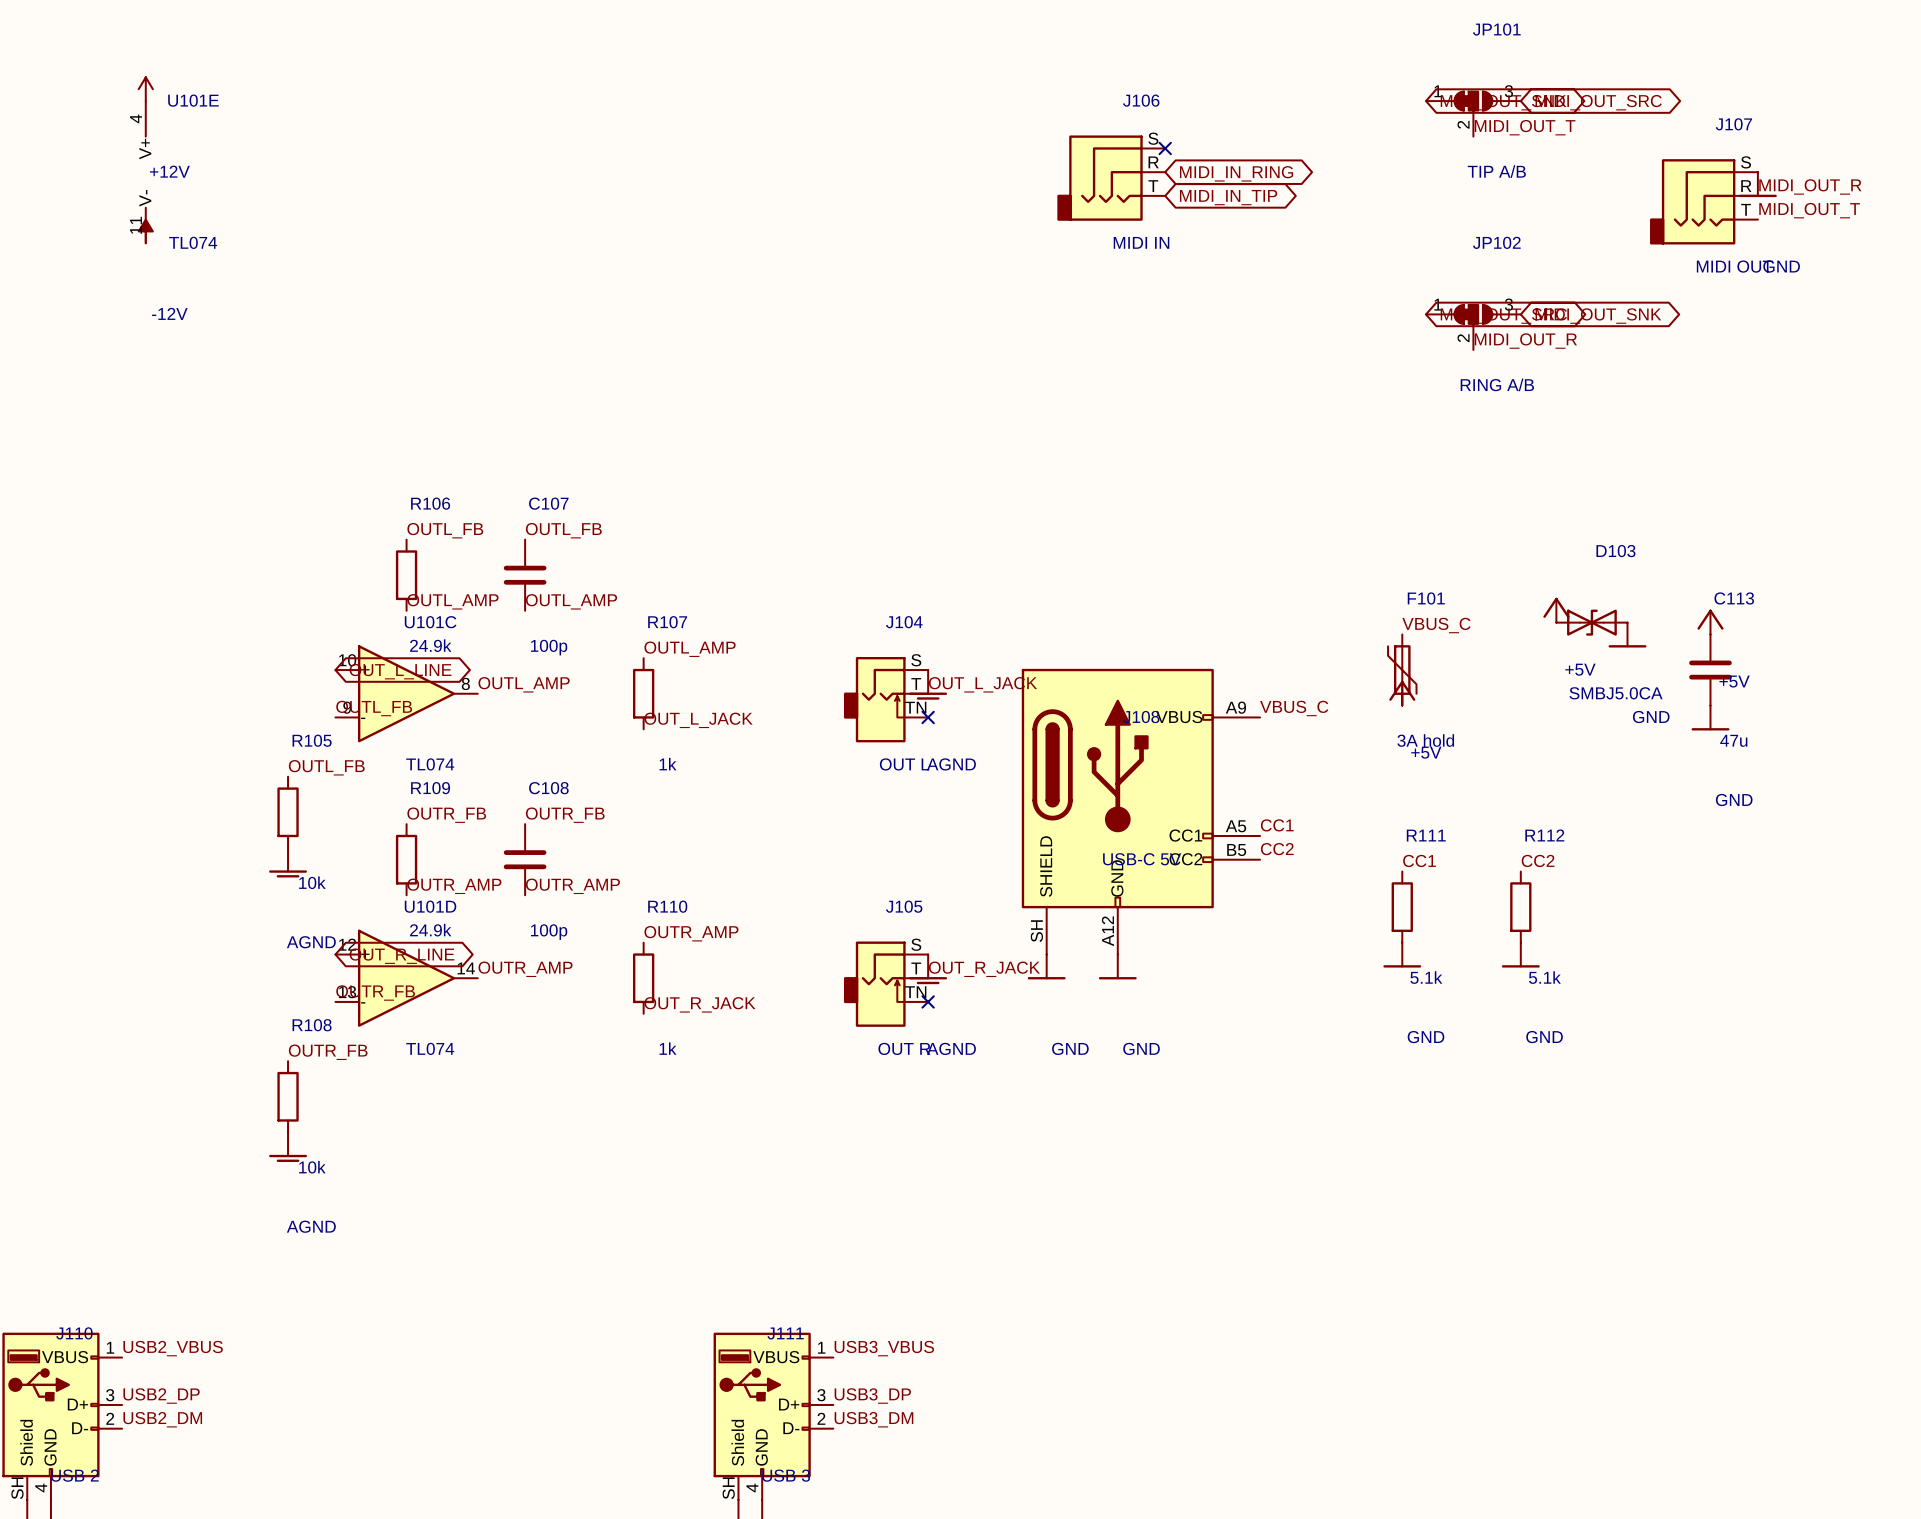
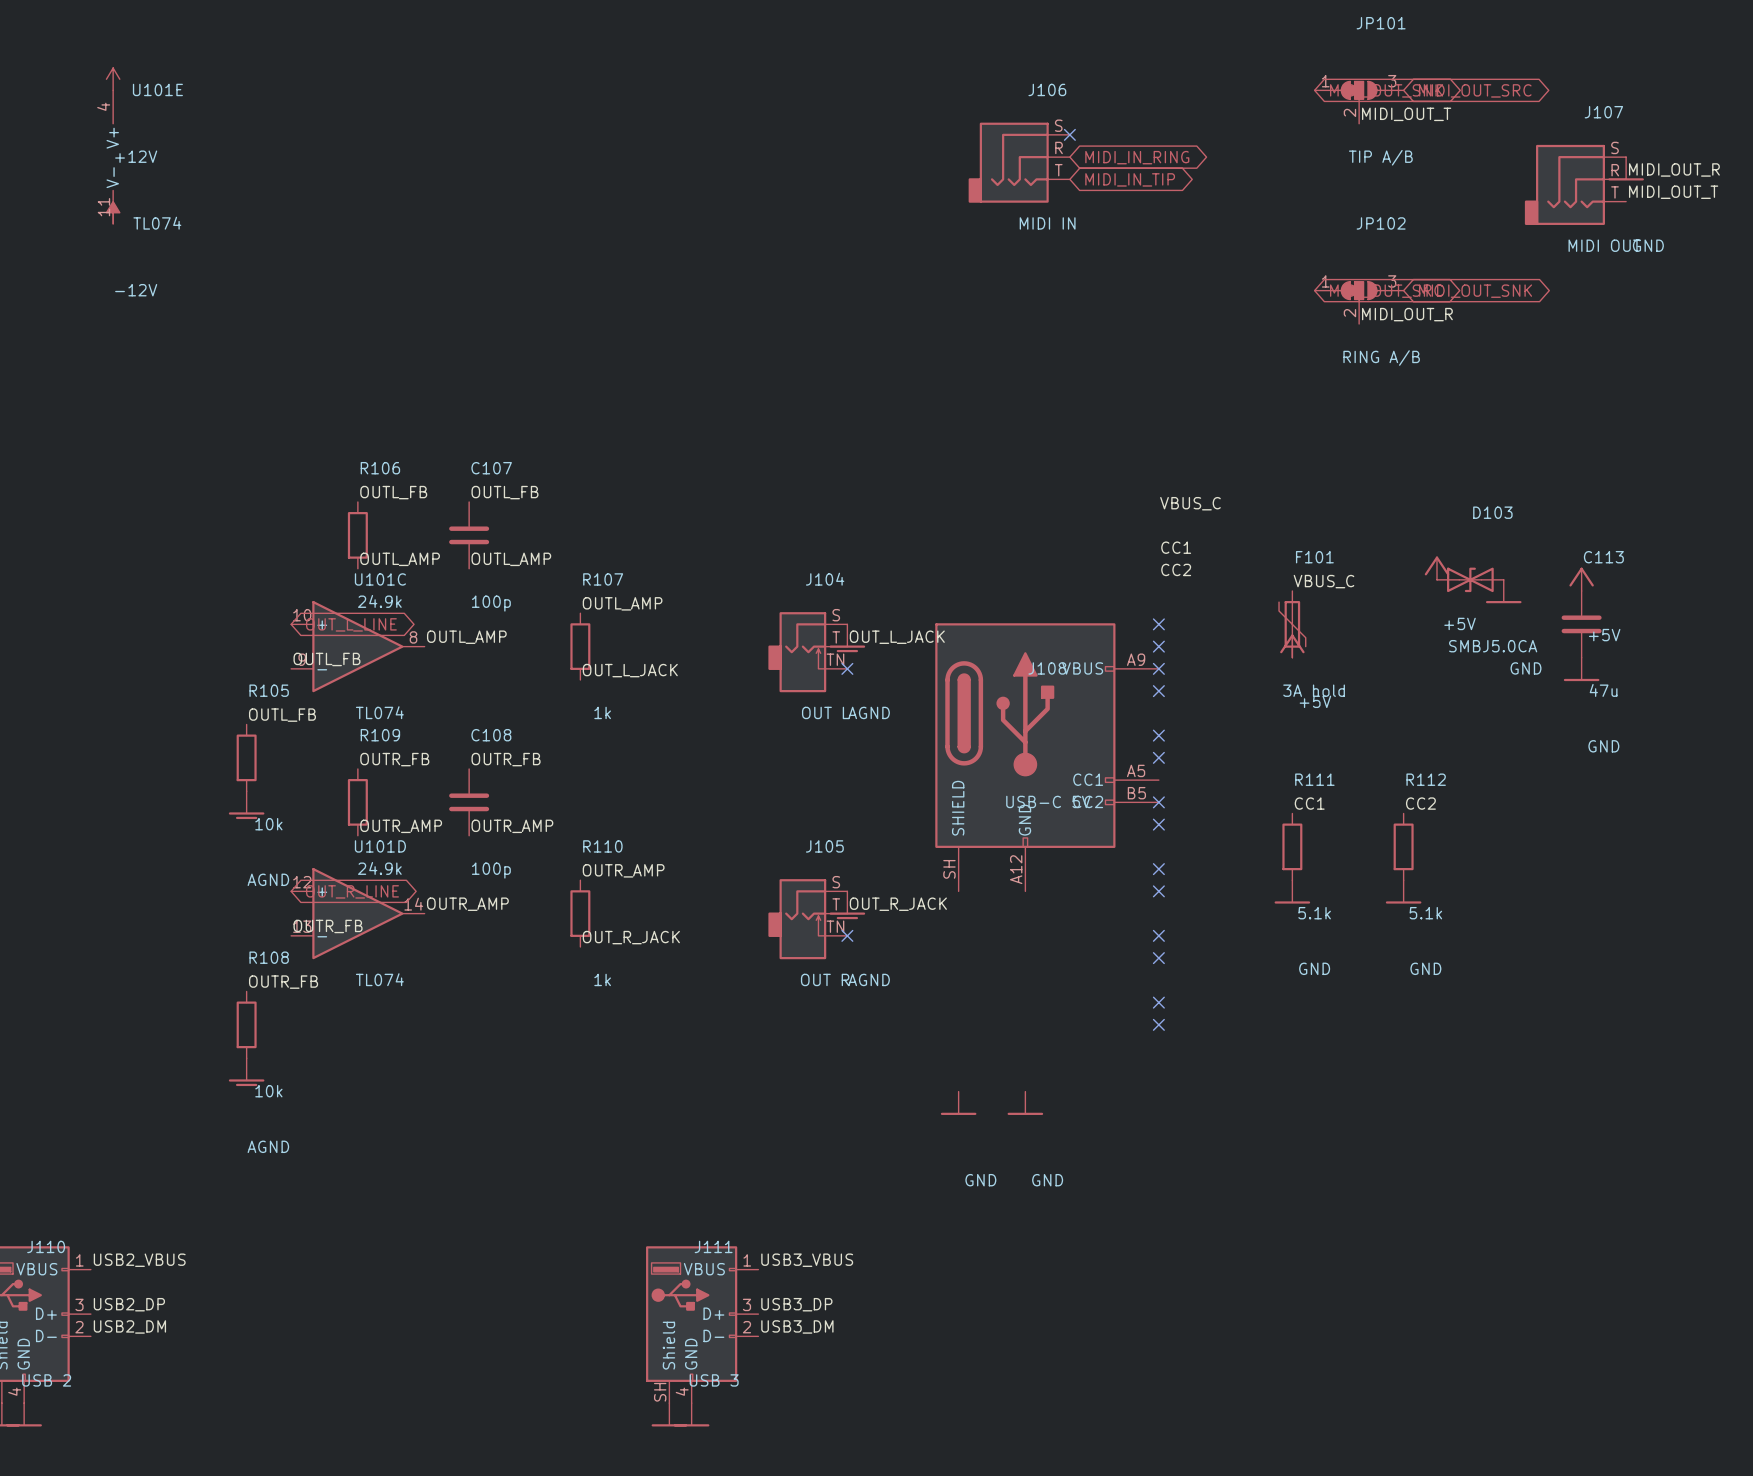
label: none -> CC1 (1176, 547)
label: none -> CC2 (1176, 569)
no-connect mark: none -> (1158, 624)
no-connect mark: none -> (1158, 646)
label position: VBUS_C (1294, 708) -> VBUS_C (1190, 503)
no-connect mark: none -> (1158, 668)
no-connect mark: none -> (1158, 691)
no-connect mark: none -> (1158, 735)
no-connect mark: none -> (1158, 757)
label: CC1 (1277, 825) -> none
label: CC2 (1277, 849) -> none
no-connect mark: none -> (1158, 802)
no-connect mark: none -> (1158, 824)
no-connect mark: none -> (1158, 869)
no-connect mark: none -> (1158, 891)
power symbol: GND (1046, 966) -> none
power symbol: GND (1117, 966) -> none
no-connect mark: none -> (1158, 935)
no-connect mark: none -> (1158, 958)
no-connect mark: none -> (1158, 1002)
no-connect mark: none -> (1158, 1024)
power symbol: none -> GND (958, 1103)
power symbol: none -> GND (1025, 1103)

